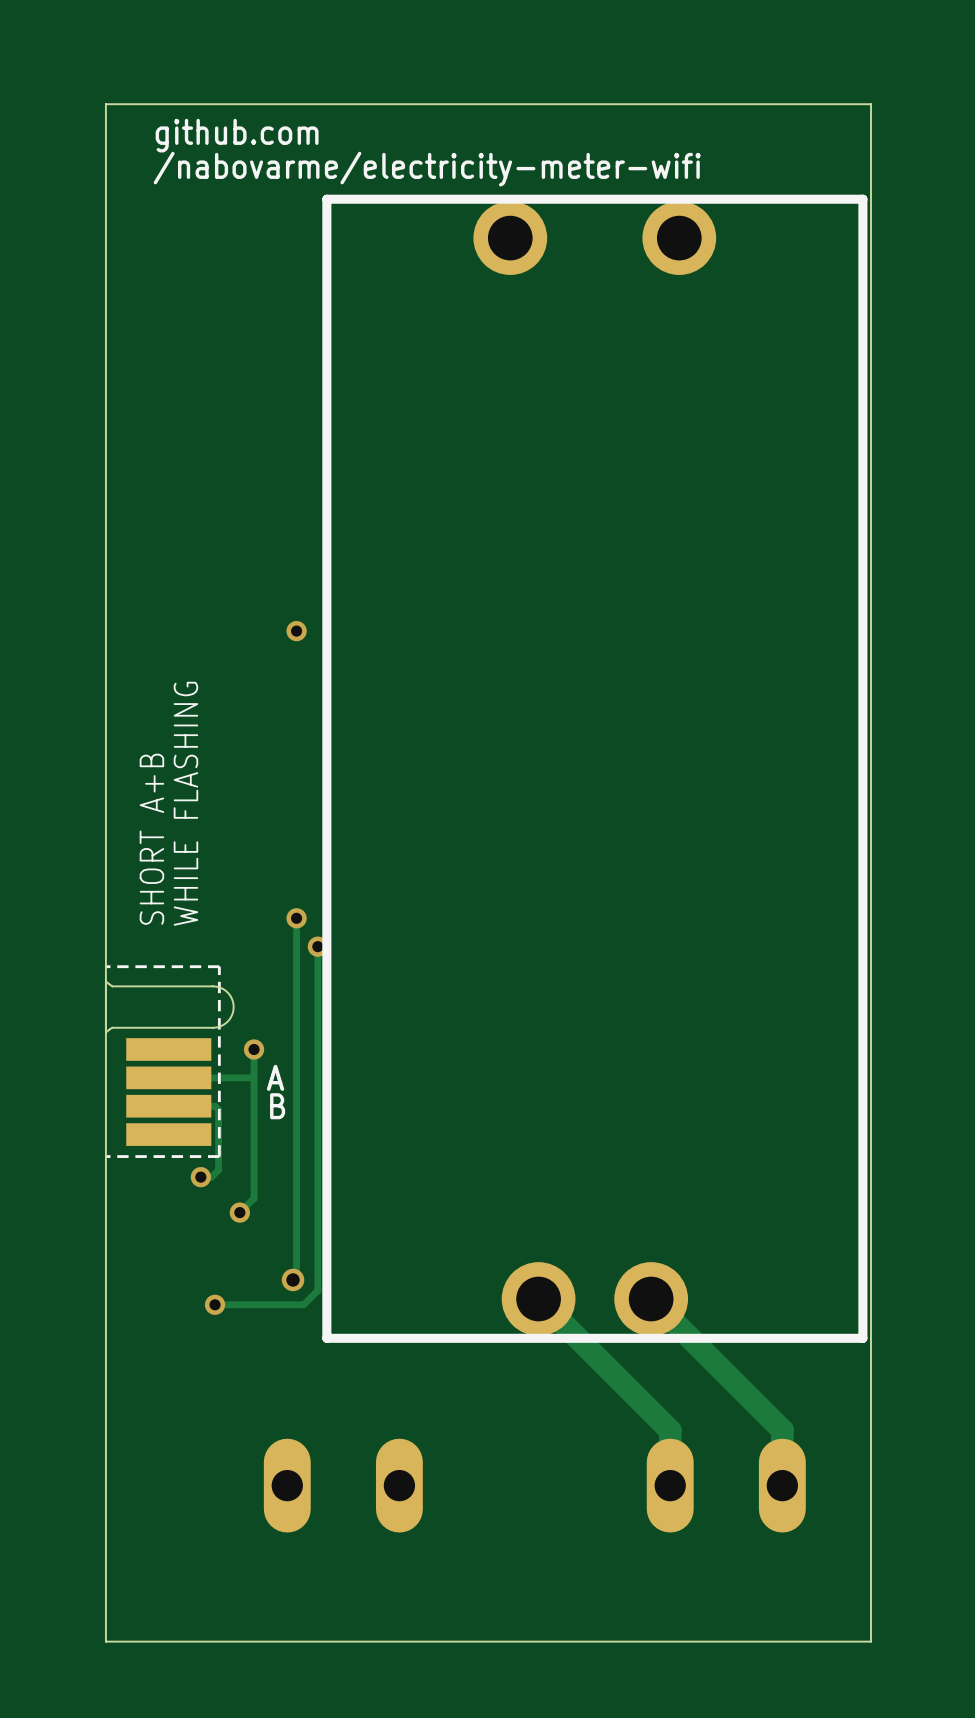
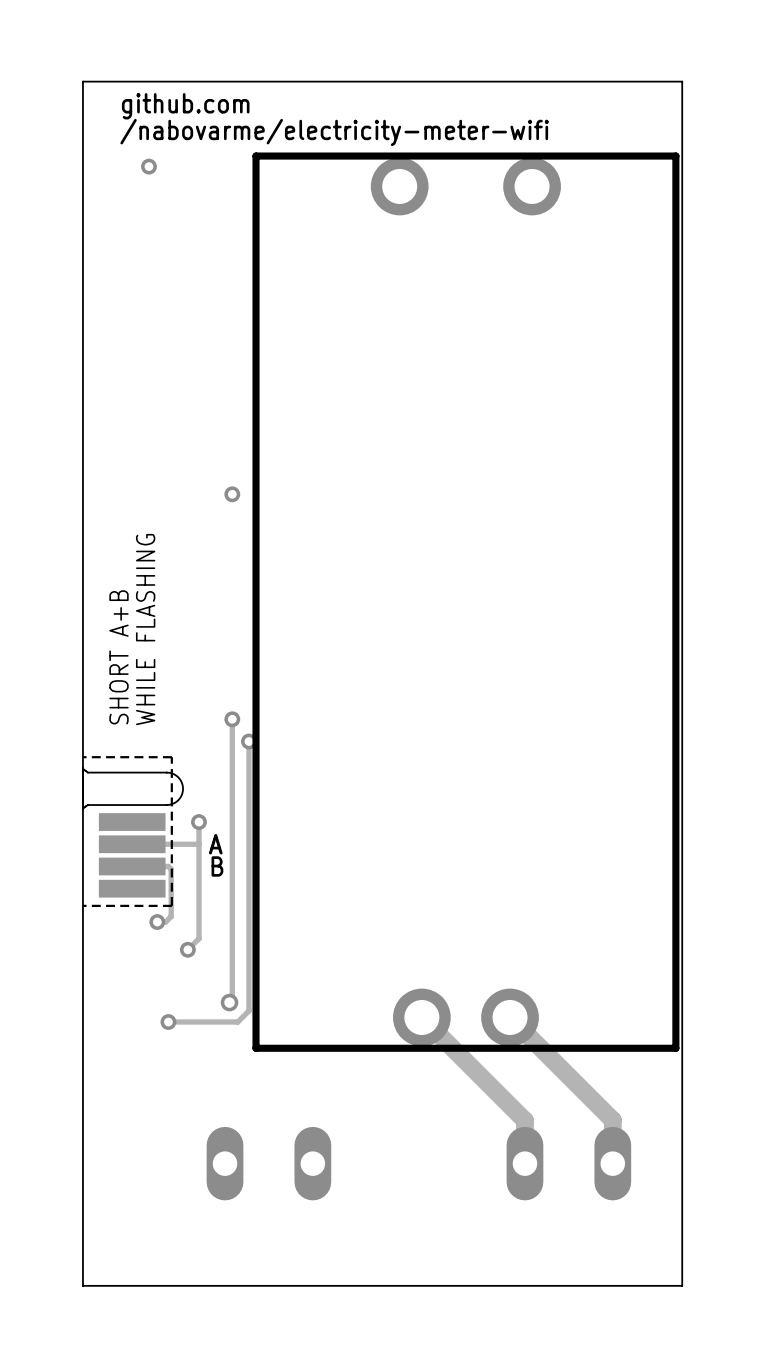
via: none -> (148, 166)

